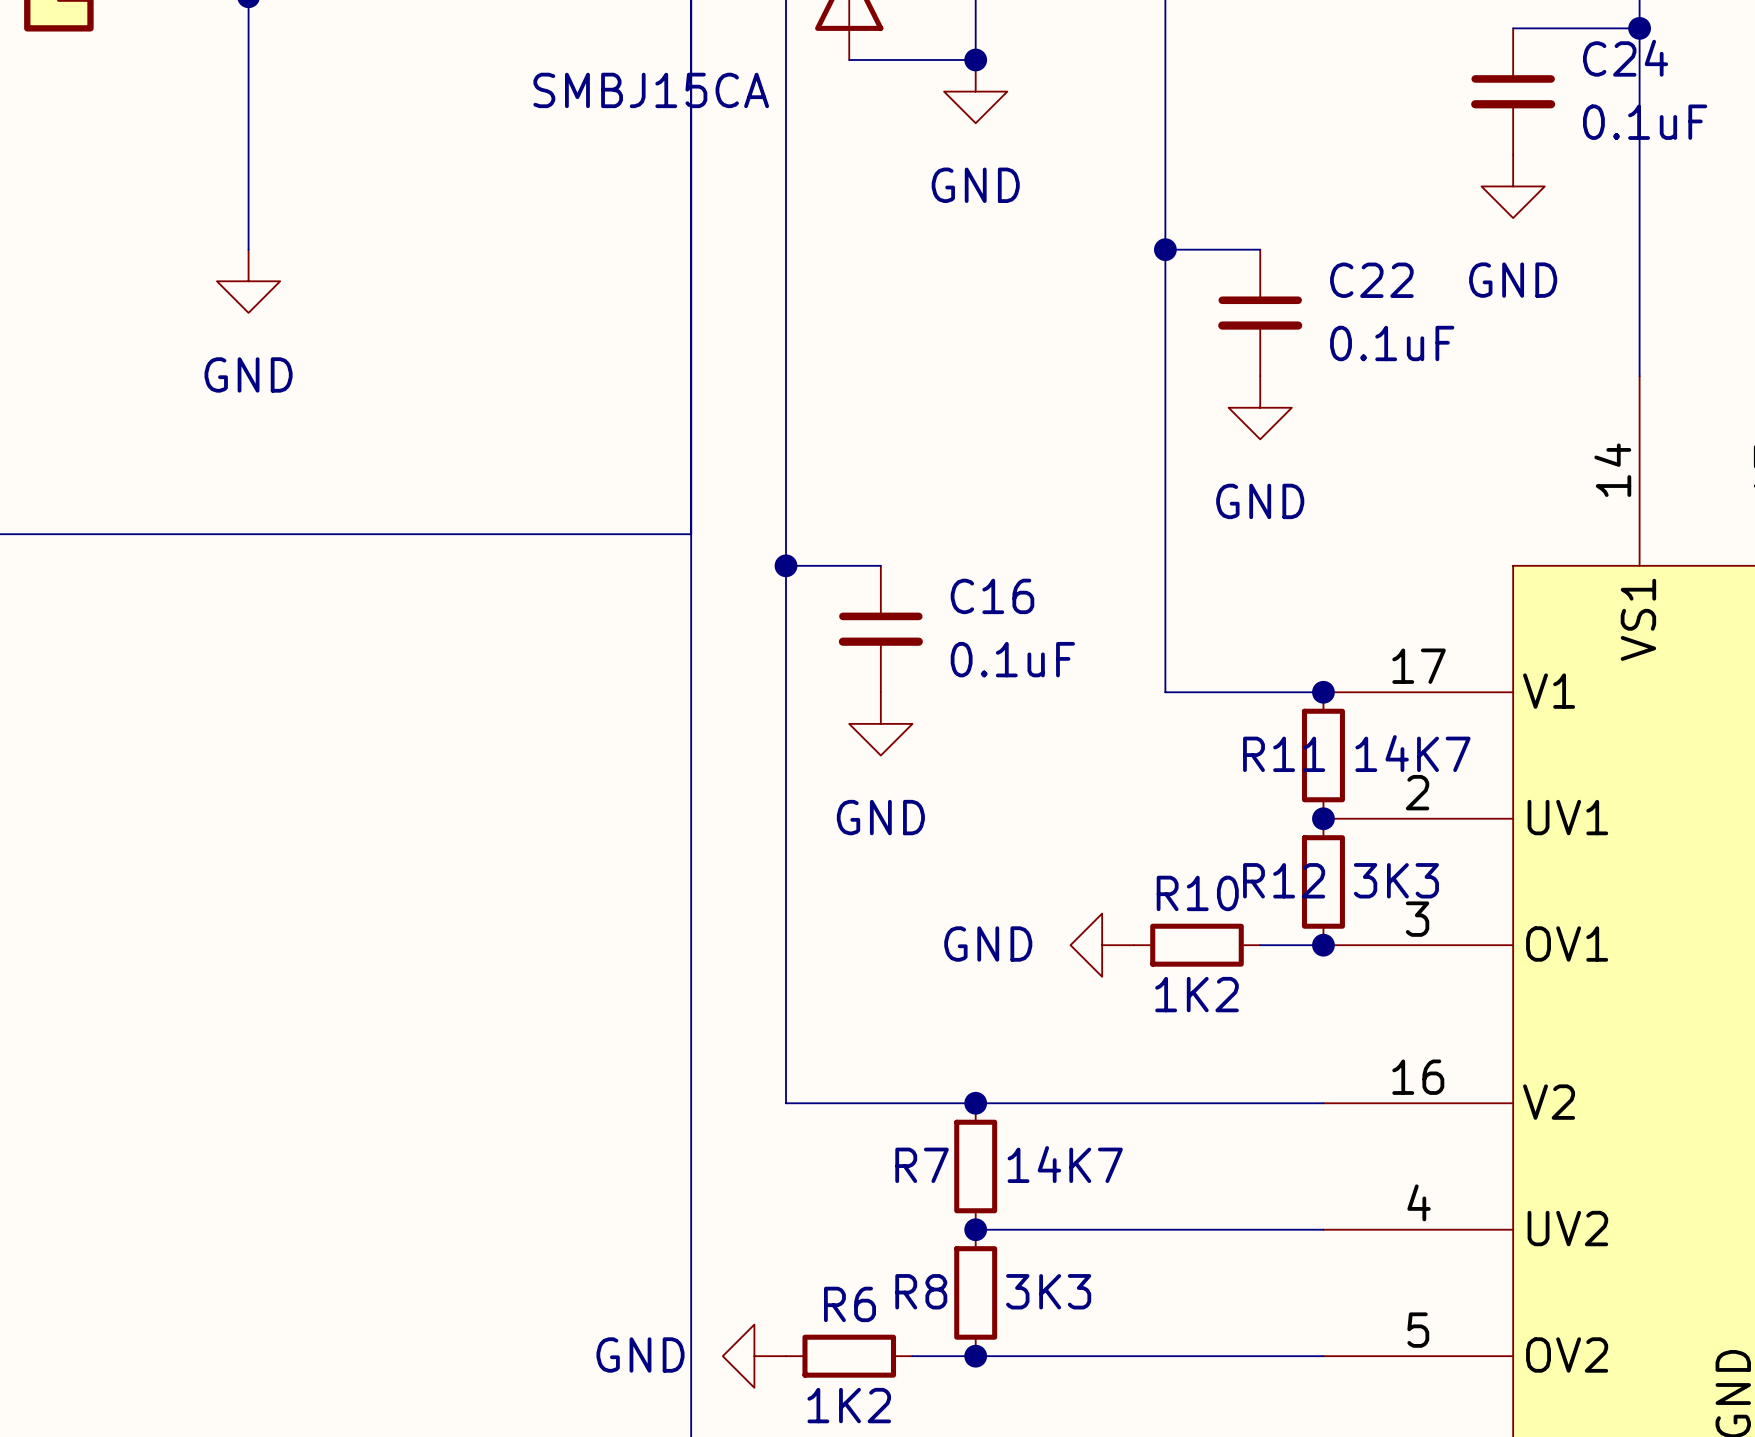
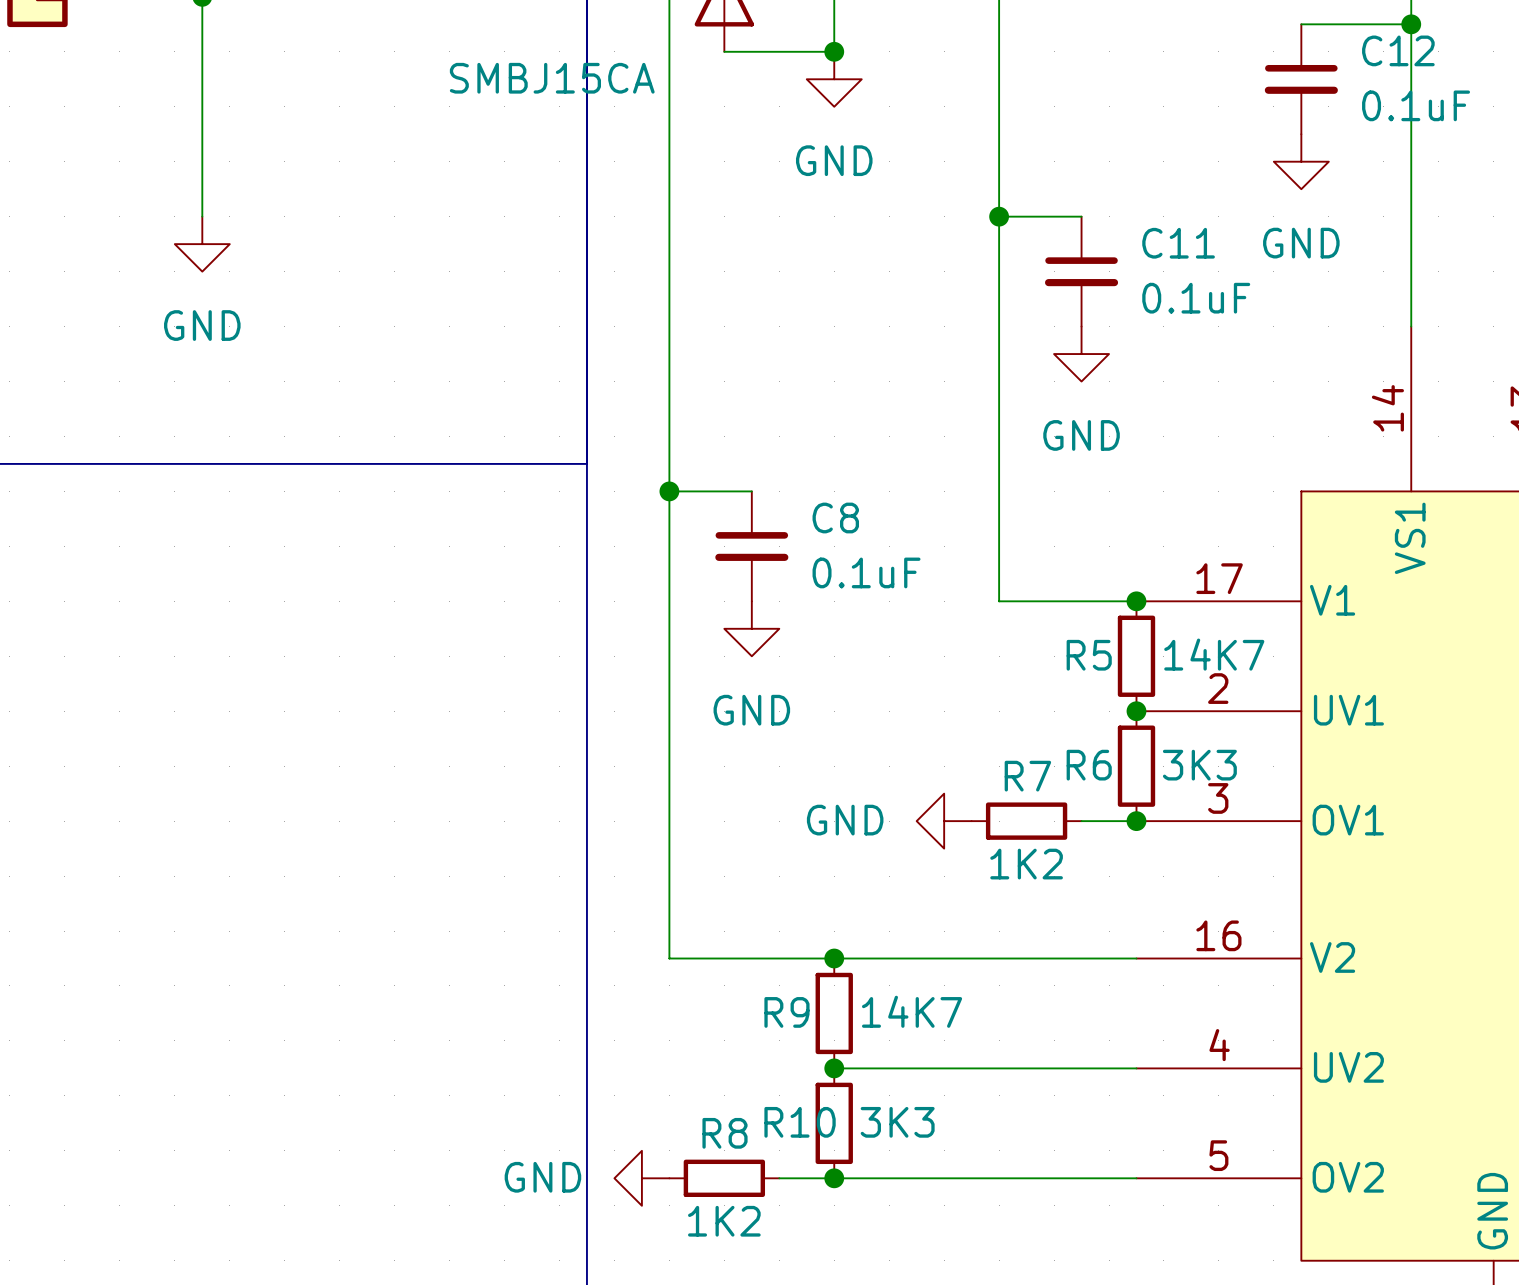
C24 name: C24 (1625, 58) -> C12 (1398, 50)
C22 name: C22 (1371, 280) -> C11 (1178, 243)
C16 name: C16 (992, 596) -> C8 (835, 518)
R11 name: R11 (1284, 754) -> R5 (1089, 655)
R12 name: R12 (1284, 880) -> R6 (1089, 765)
R10 name: R10 (1197, 893) -> R7 (1027, 776)
R7 name: R7 (922, 1165) -> R9 (786, 1012)
R8 name: R8 (921, 1291) -> R10 (800, 1122)
R6 name: R6 (849, 1304) -> R8 (725, 1133)

